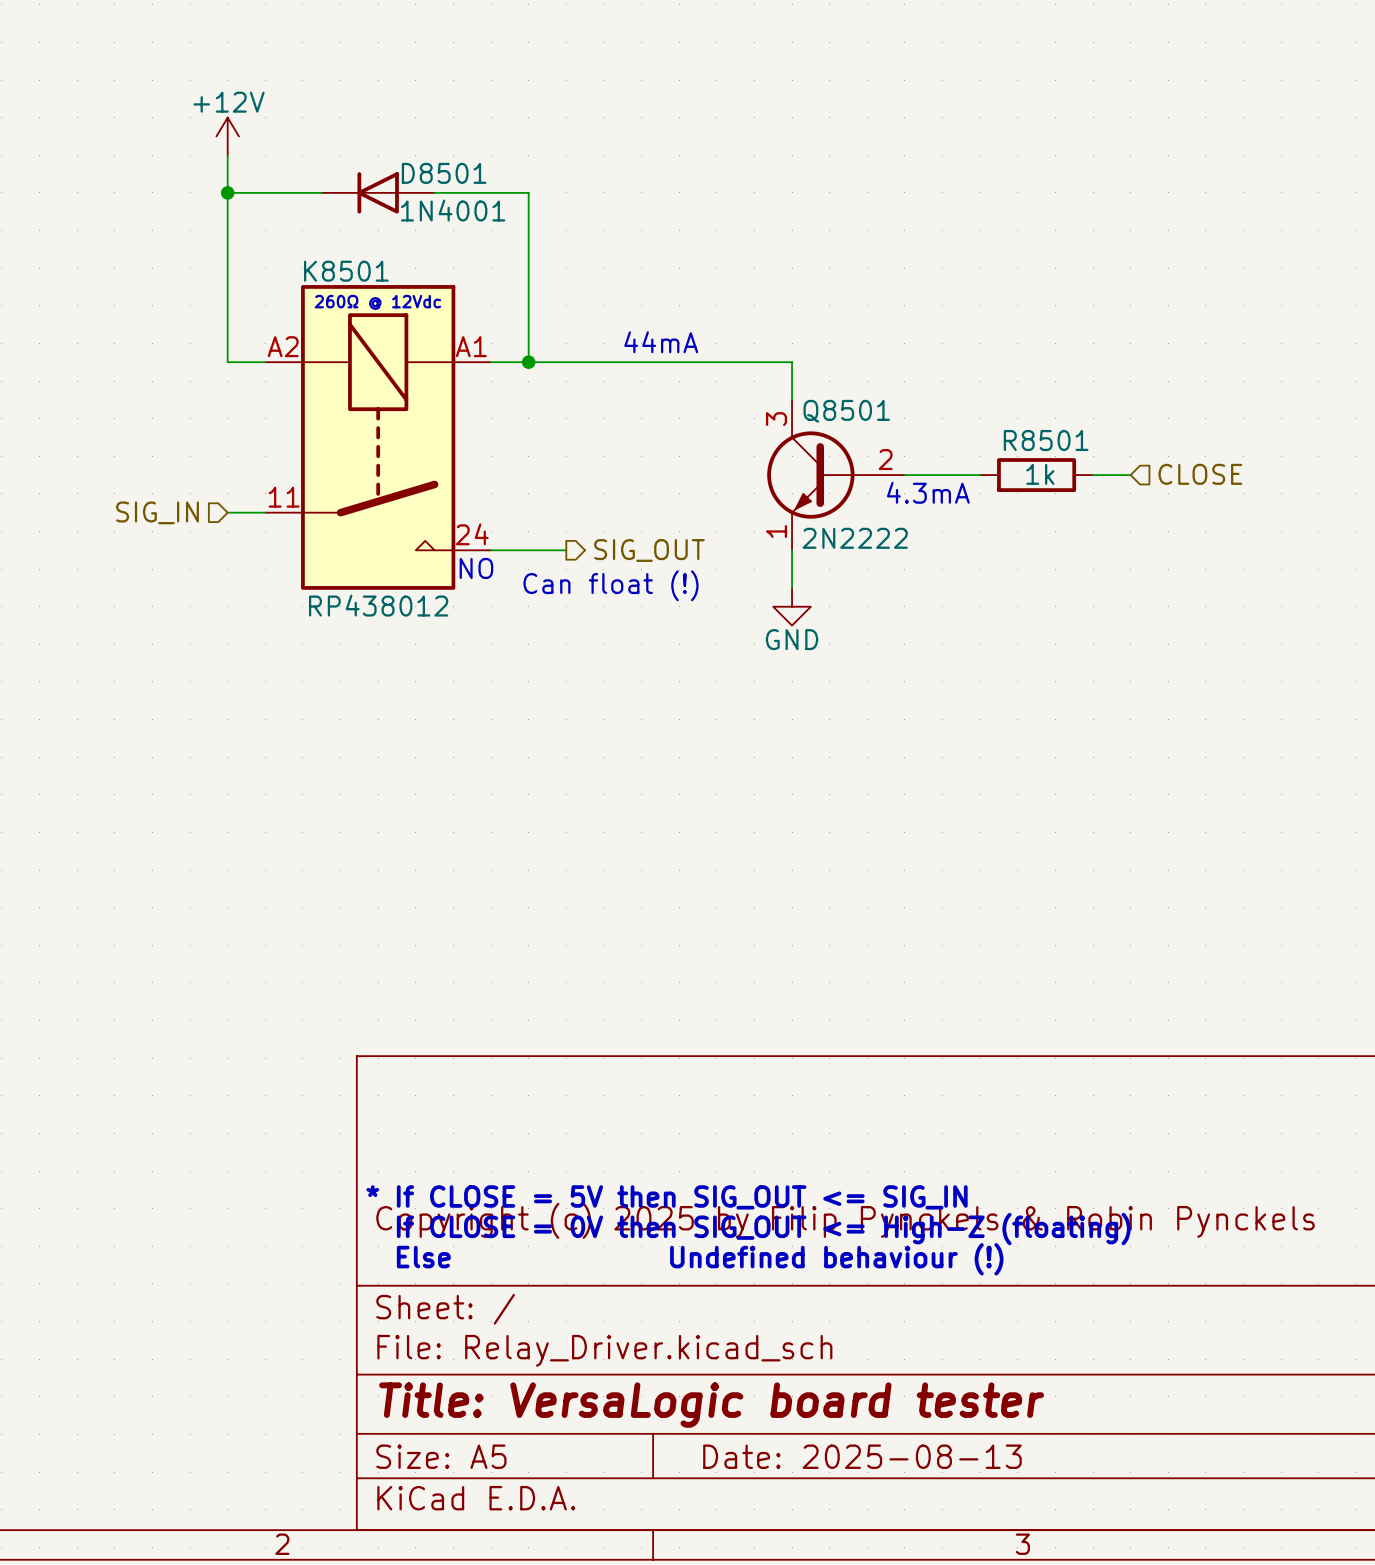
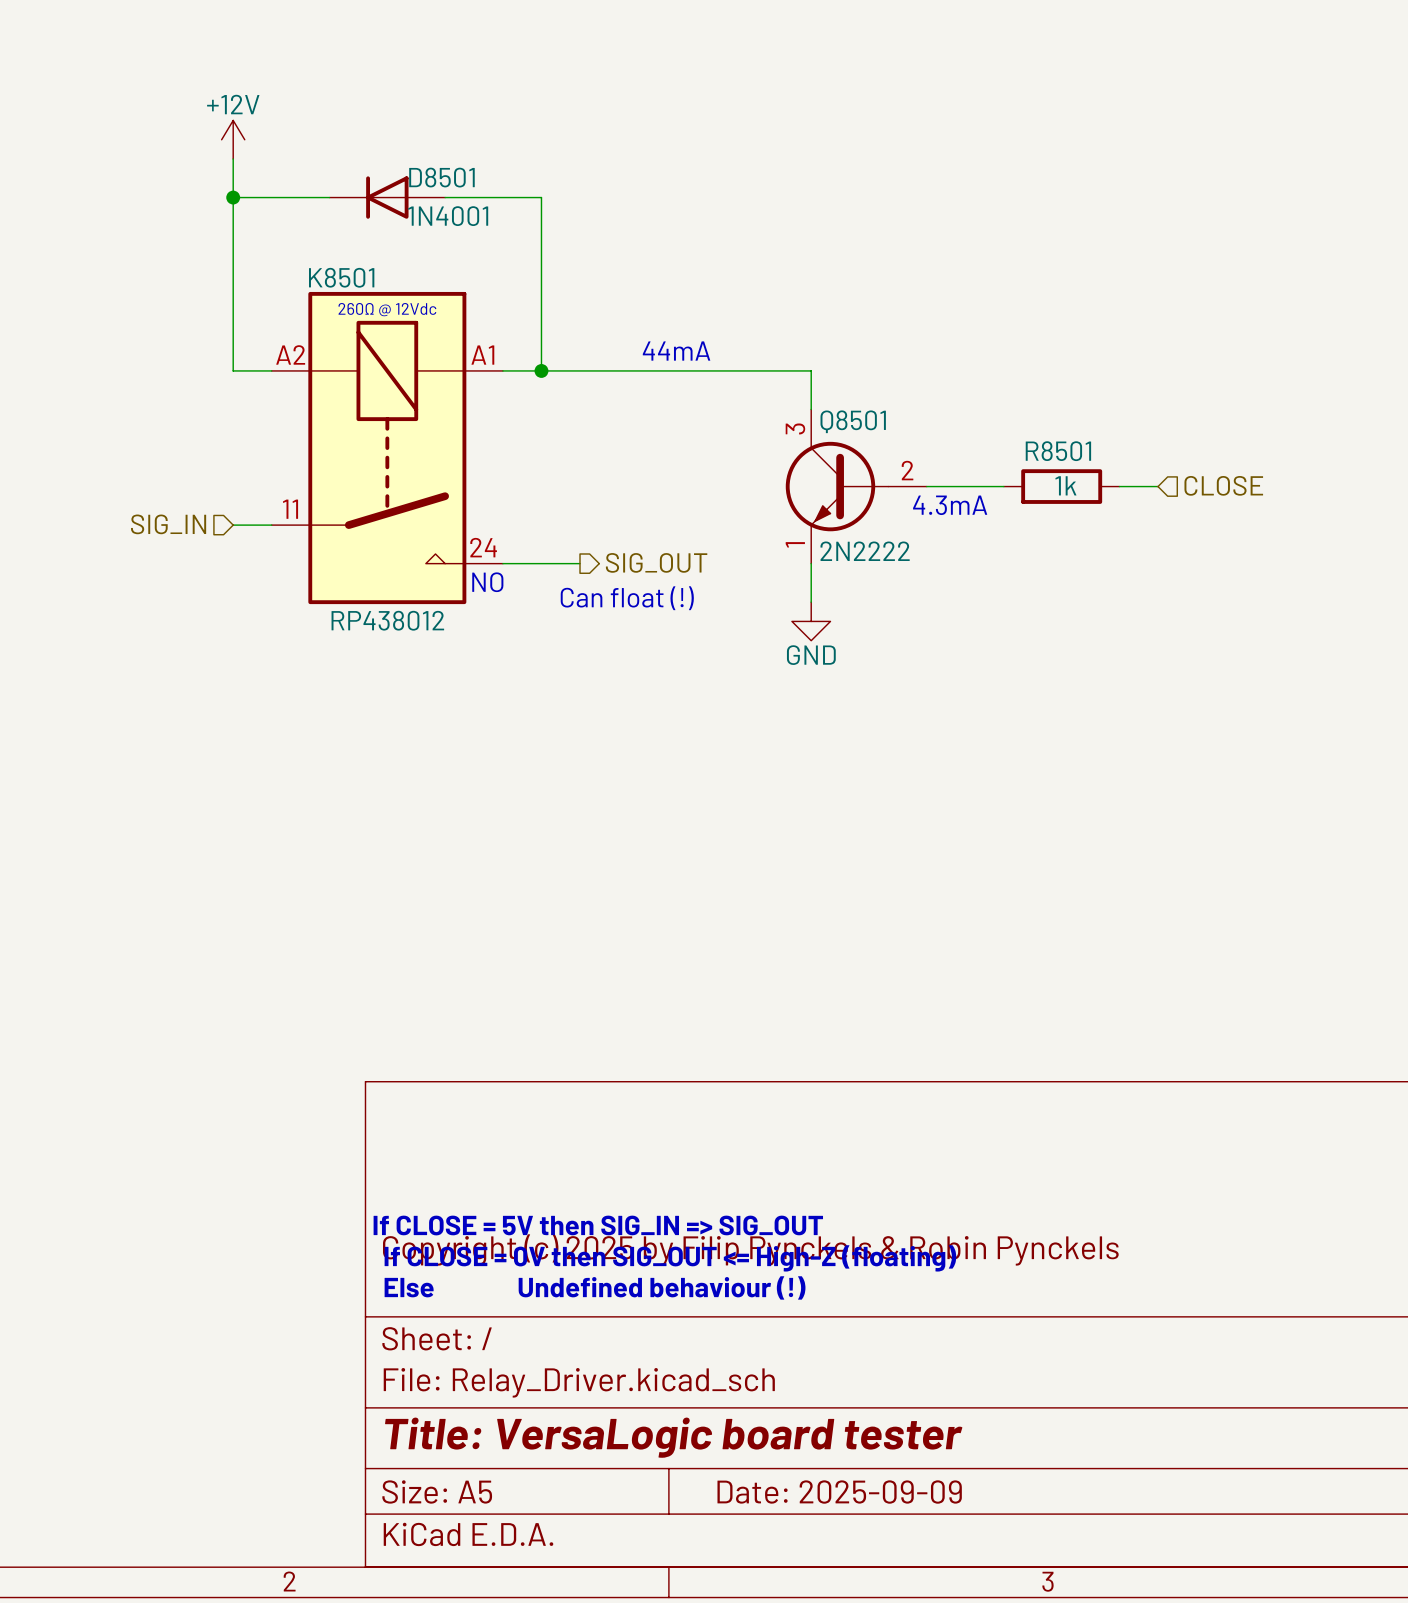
text: * If CLOSE = 5V then SIG_OUT <= SIG_IN (667, 1197) -> If CLOSE = 5V then SIG_IN => SIG_OUT (598, 1225)
title block: Date: 2025-08-13 (862, 1456) -> Date: 2025-09-09 (839, 1492)

